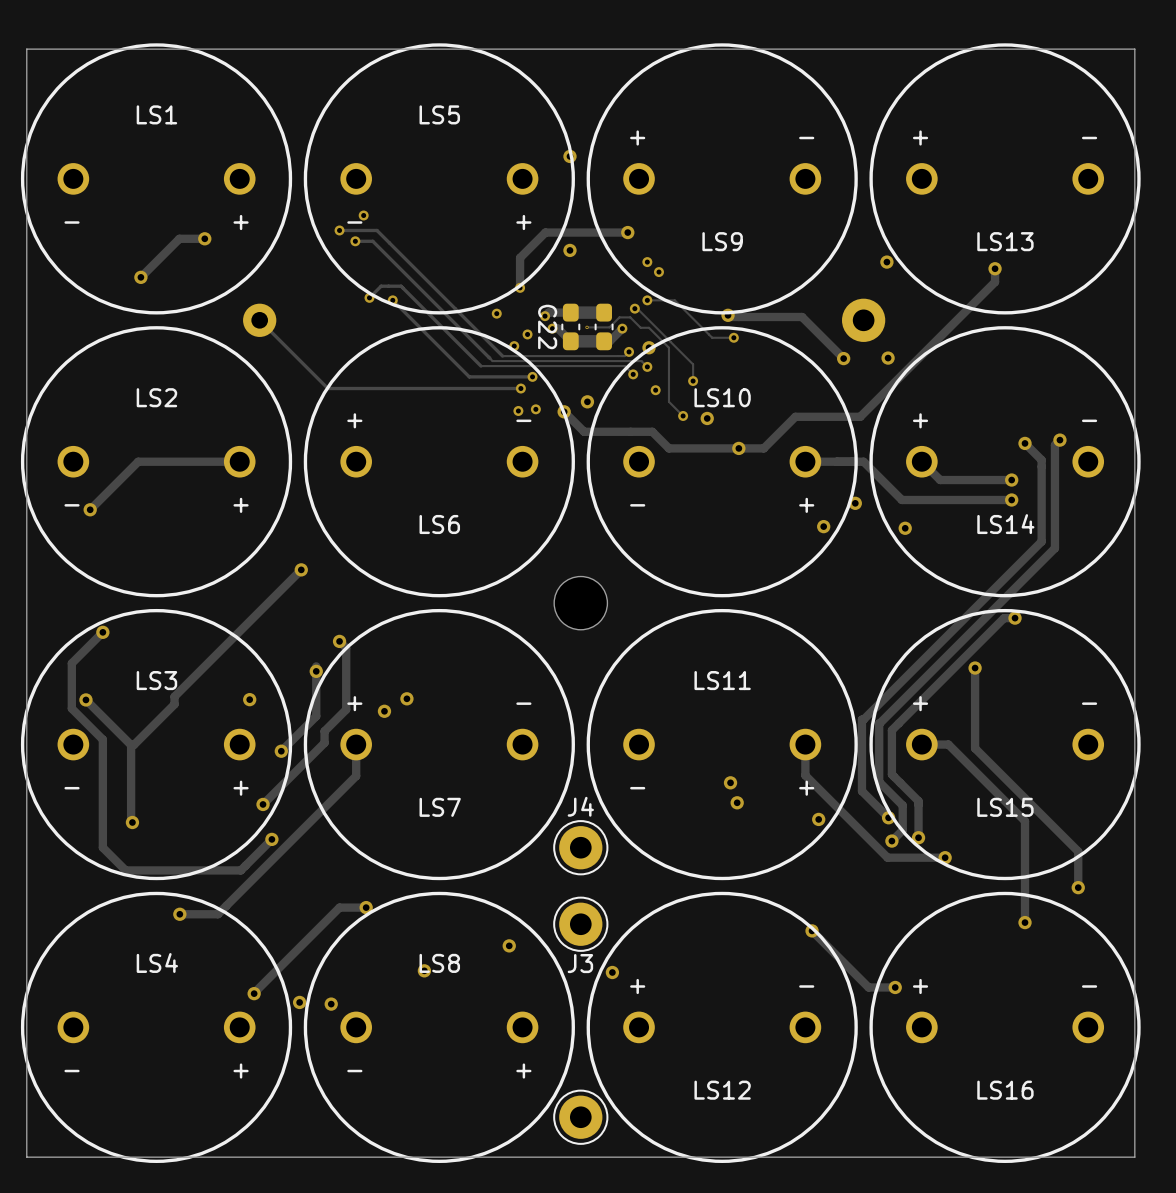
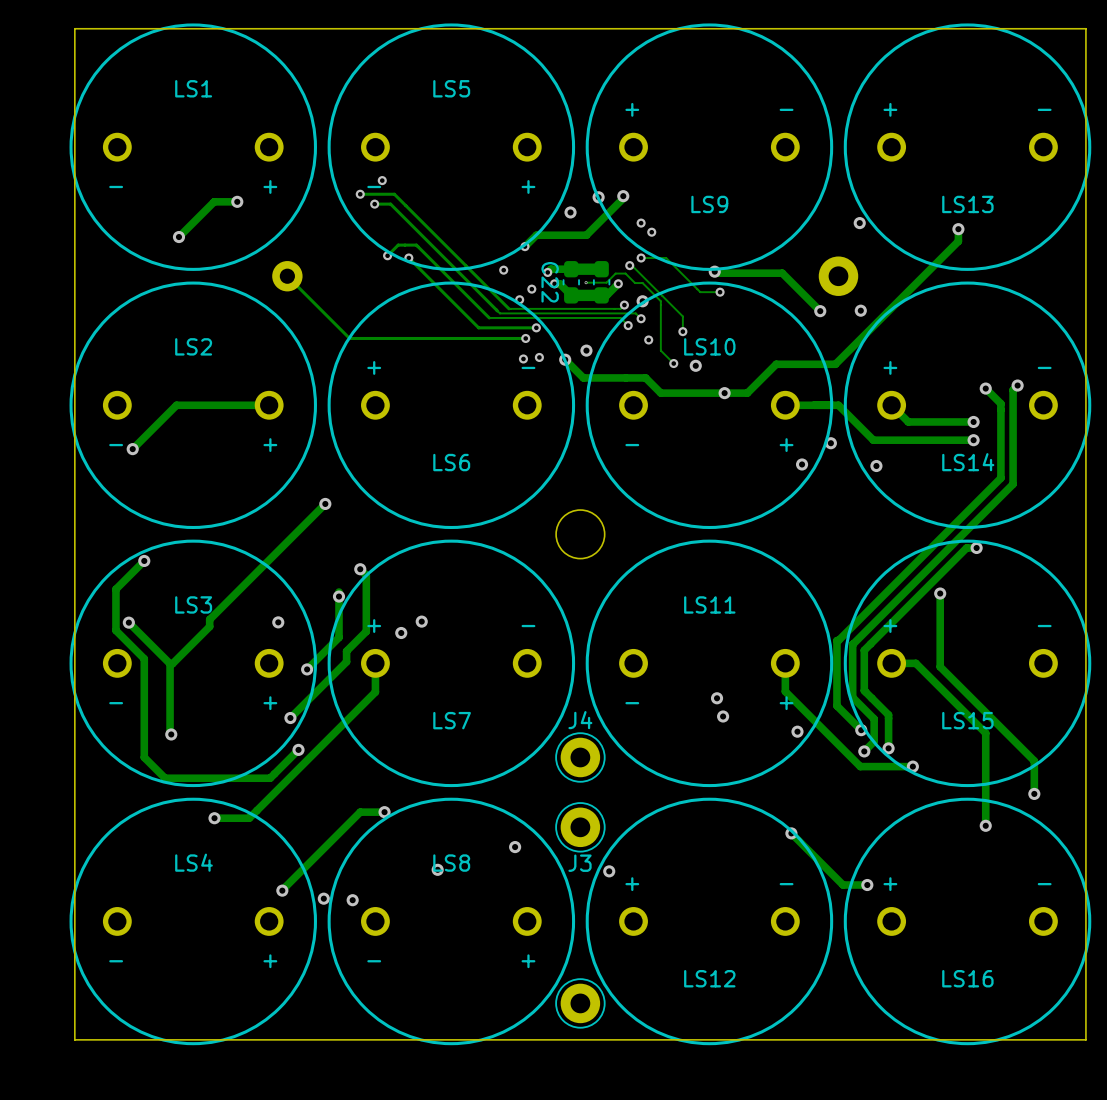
via position: (569, 156) -> (598, 197)
track: (627, 232) (545, 232) (520, 257) (520, 287) -> (623, 196) (623, 198) (586, 235) (536, 235) (524, 246)

